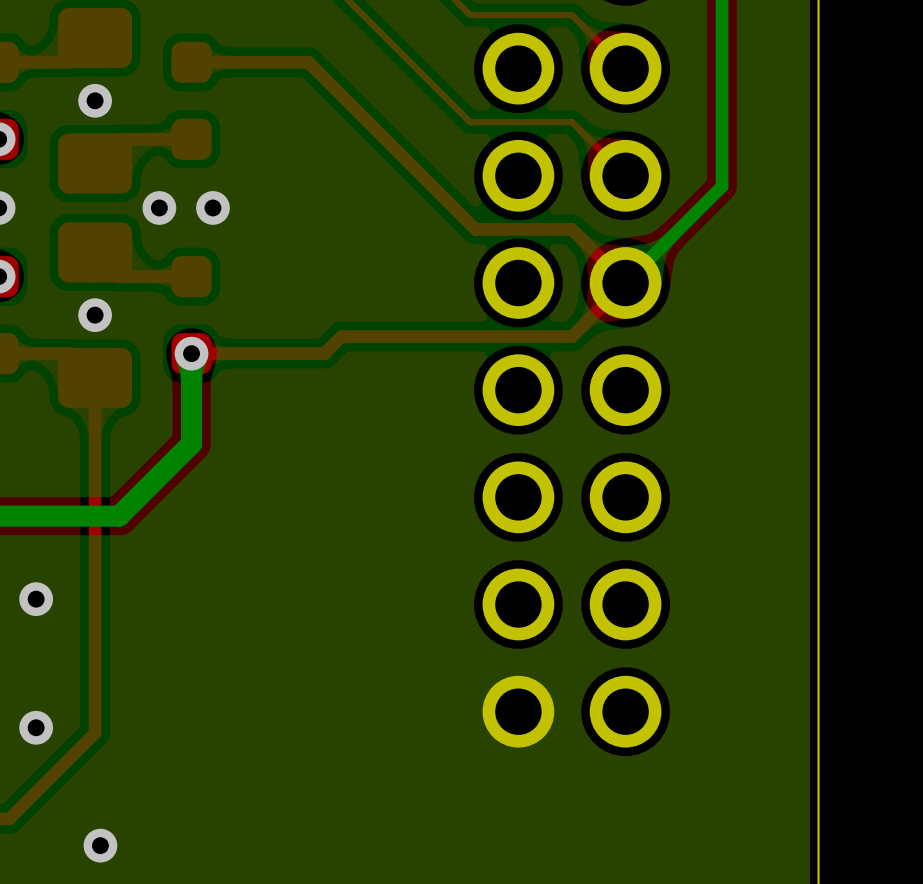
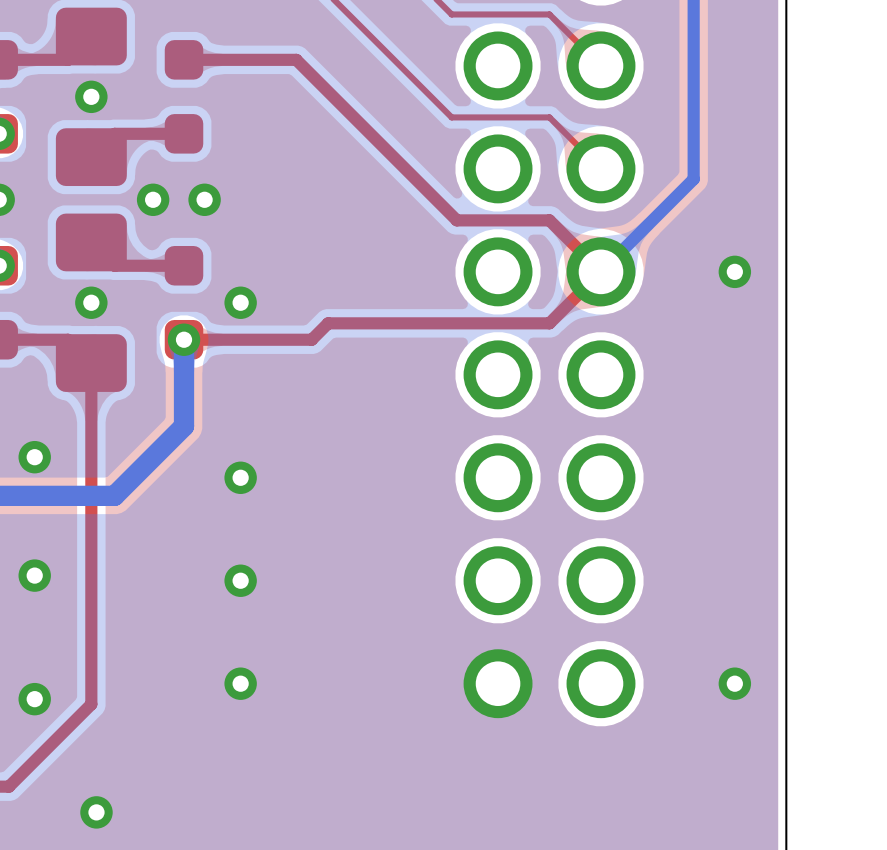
via: none -> (734, 271)
via: none -> (240, 302)
via: none -> (34, 457)
via: none -> (240, 477)
via: none -> (240, 580)
via: none -> (240, 683)
via: none -> (734, 683)

